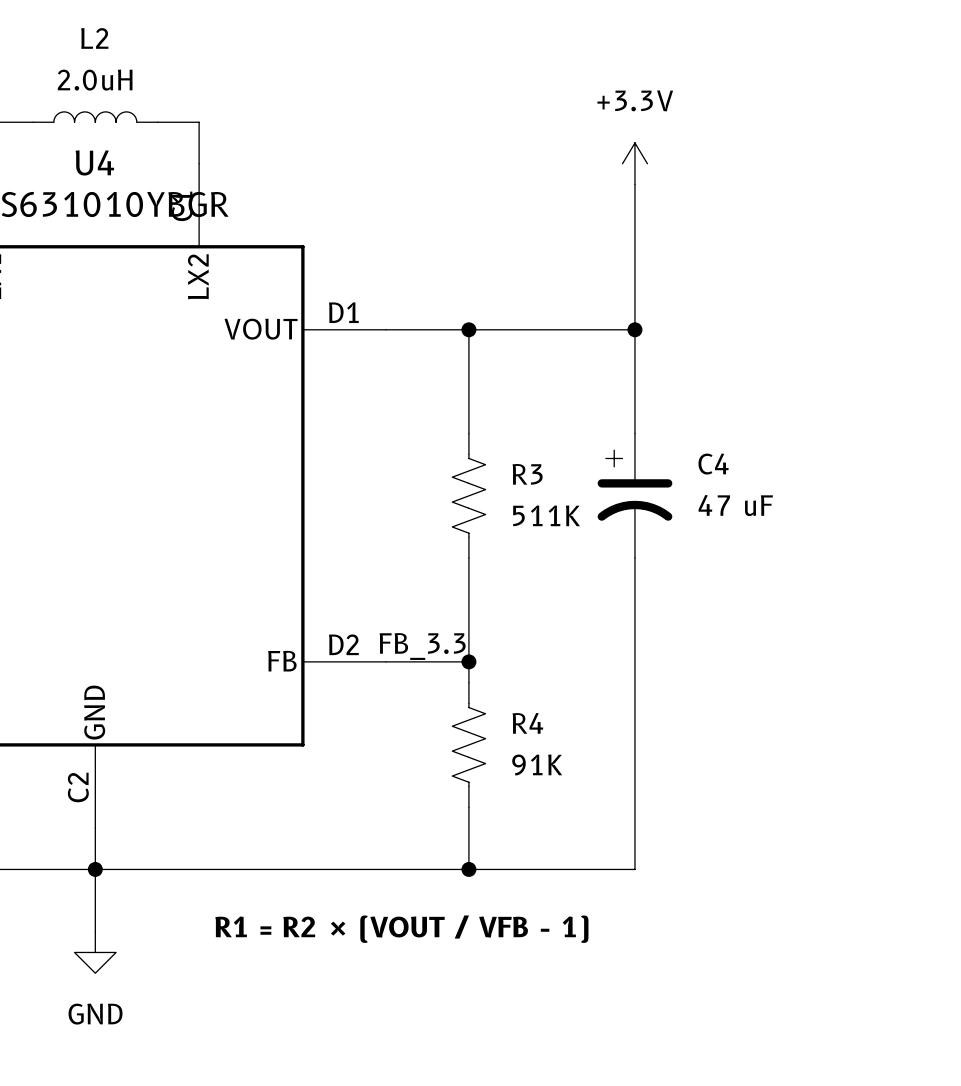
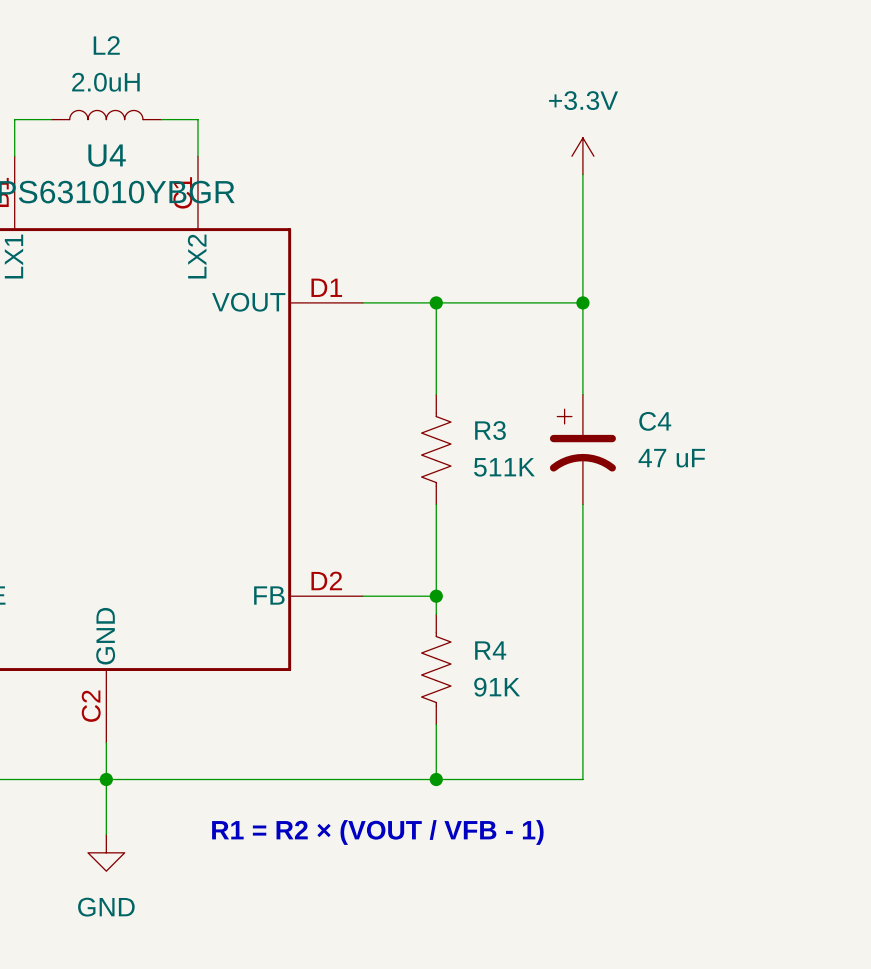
label: FB_3.3 (422, 646) -> none

